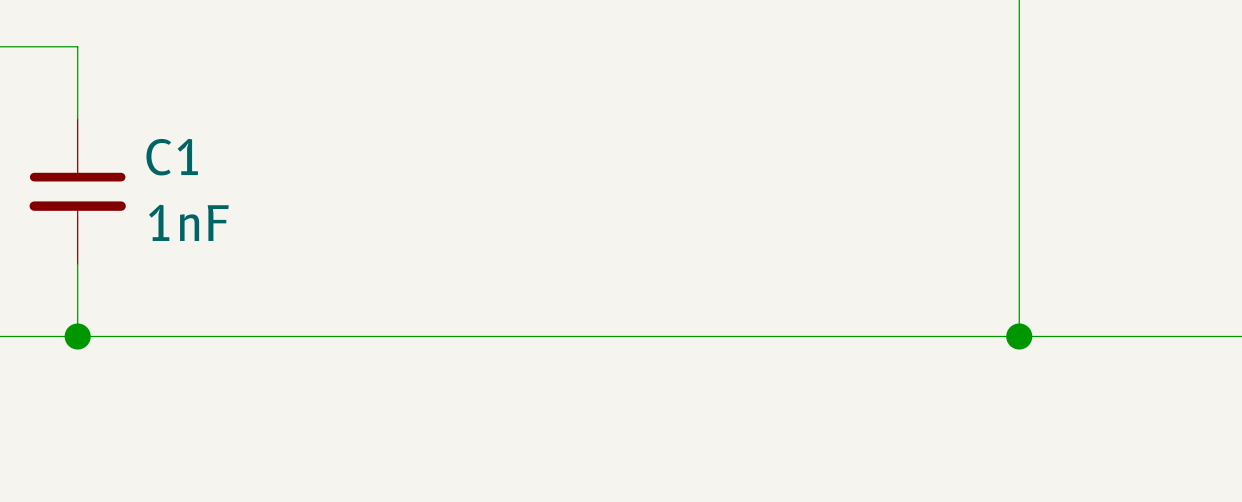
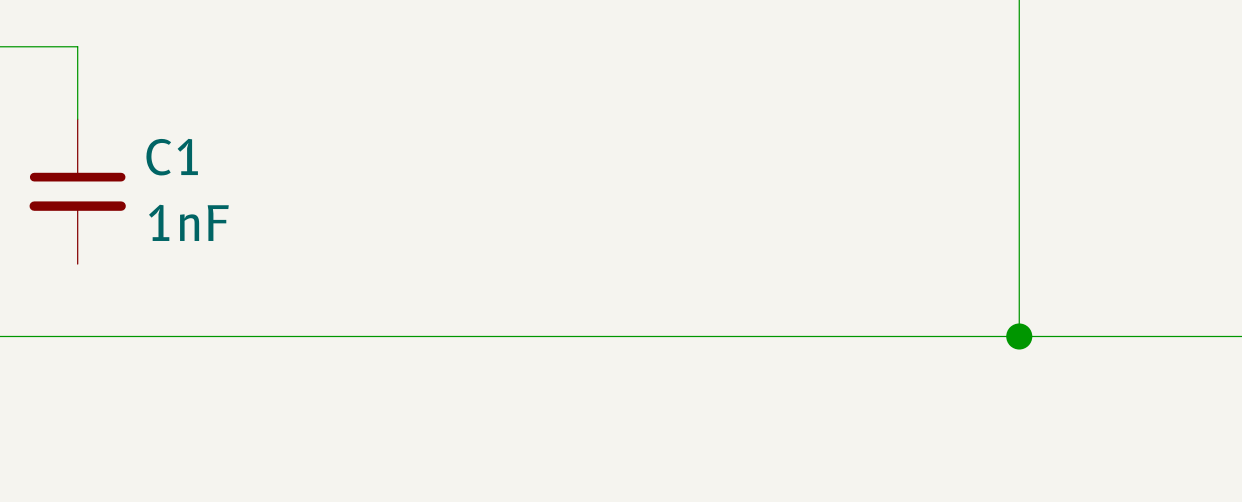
wire: (77, 264) (77, 336) -> none
junction: (77, 336) -> none

